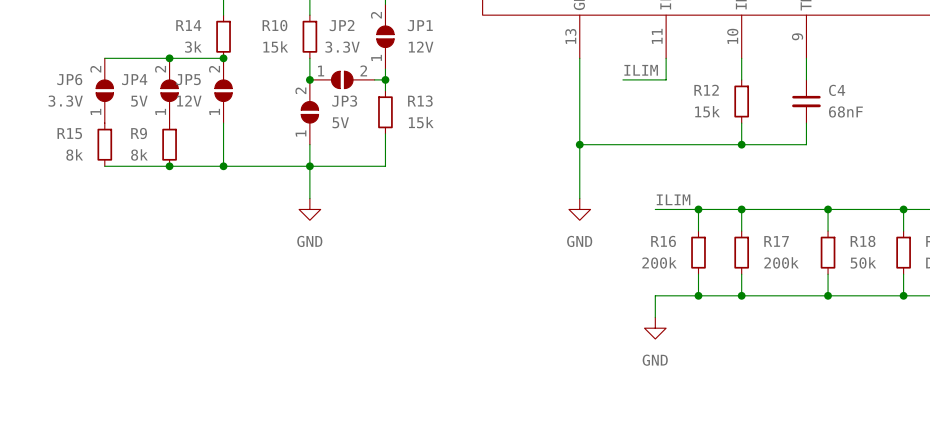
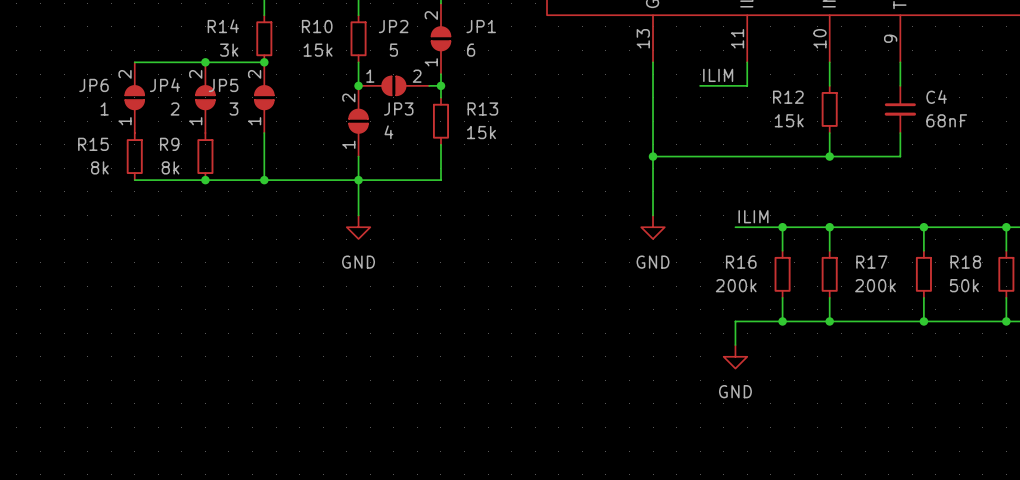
JP2 value: 3.3V (342, 47) -> 5 (393, 50)
JP1 value: 12V (421, 47) -> 6 (471, 50)
JP6 value: 3.3V (65, 101) -> 1 (104, 109)
JP4 value: 5V (139, 101) -> 2 (175, 109)
JP5 value: 12V (189, 101) -> 3 (233, 109)
JP3 value: 5V (340, 122) -> 4 (388, 132)

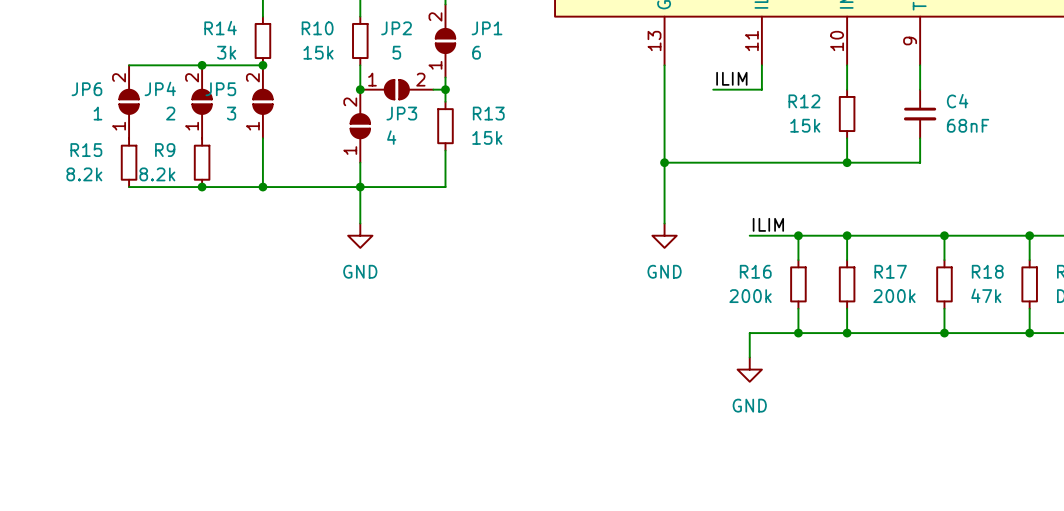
R15 value: 8k (99, 167) -> 8.2k (84, 174)
R9 value: 8k (170, 167) -> 8.2k (157, 174)
R18 value: 50k (964, 285) -> 47k (986, 295)

